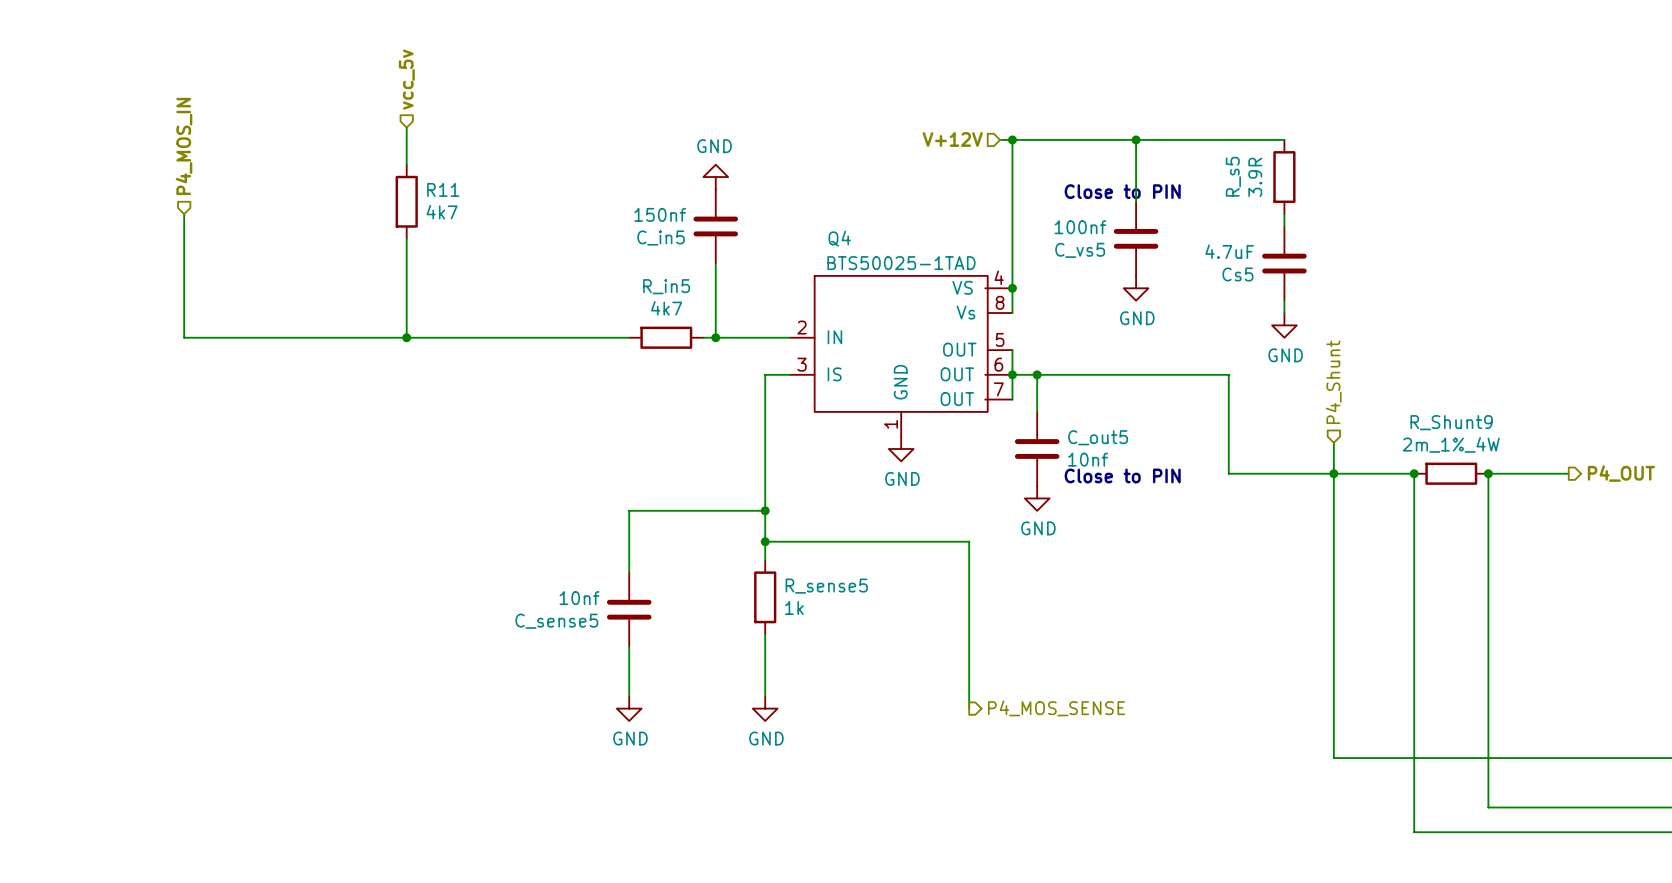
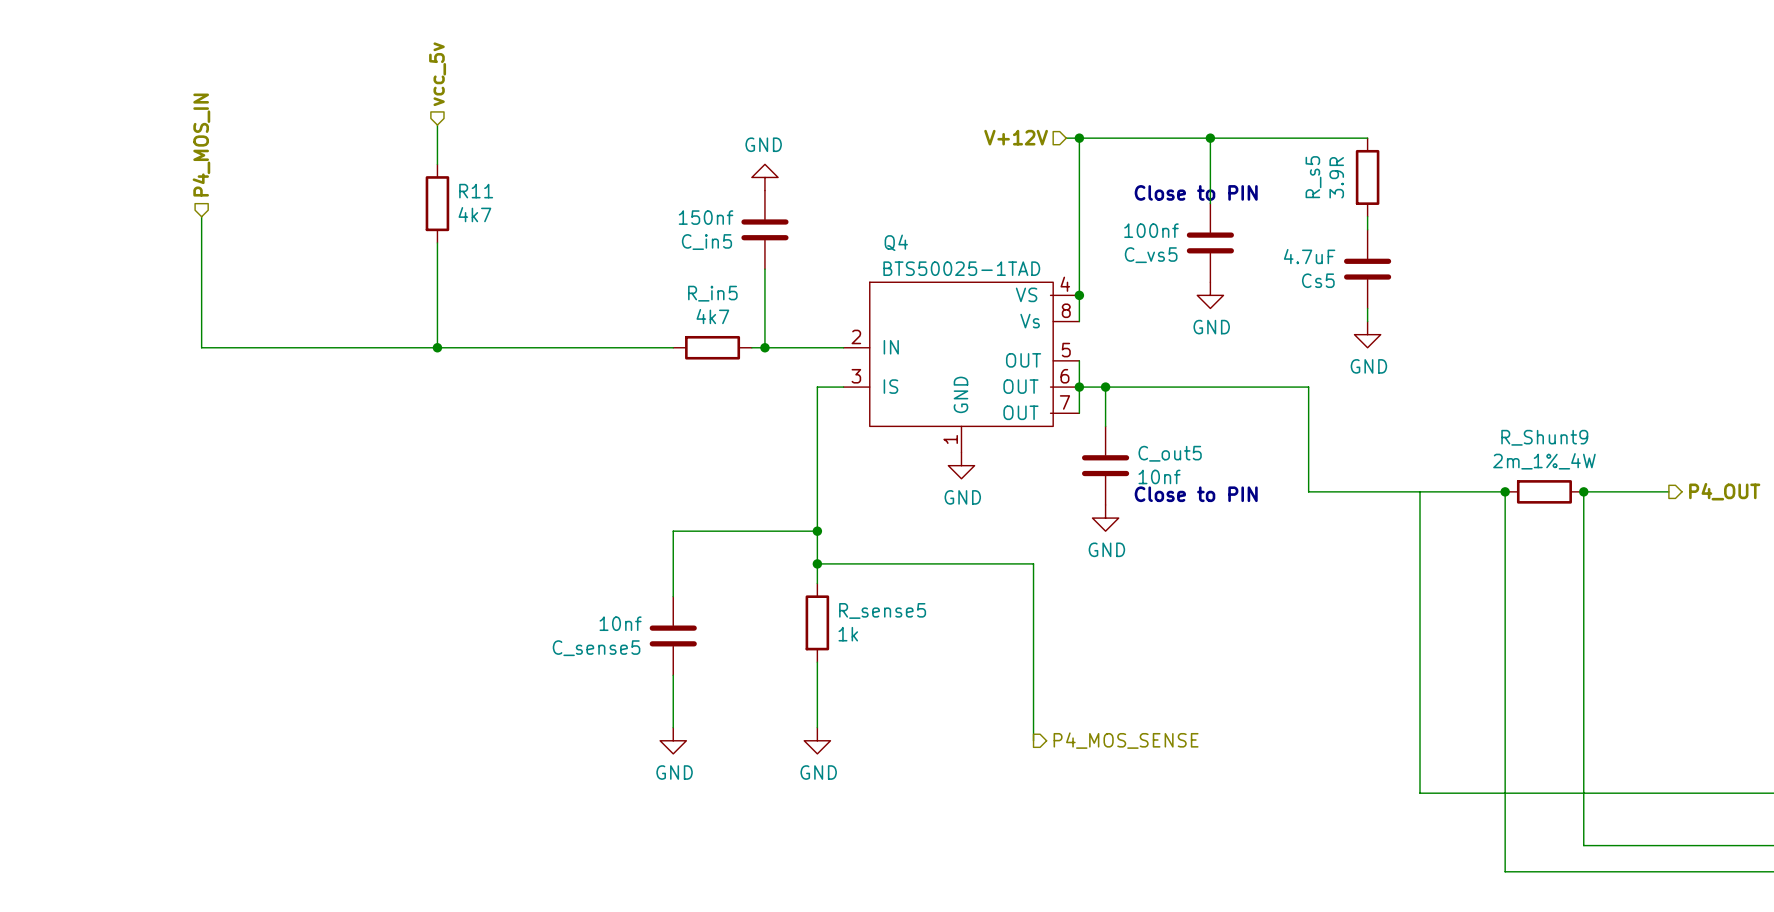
hierarchical label: P4_Shunt (1333, 382) -> none
wire: (1333, 442) (1333, 473) -> none
junction: (1333, 473) -> none

